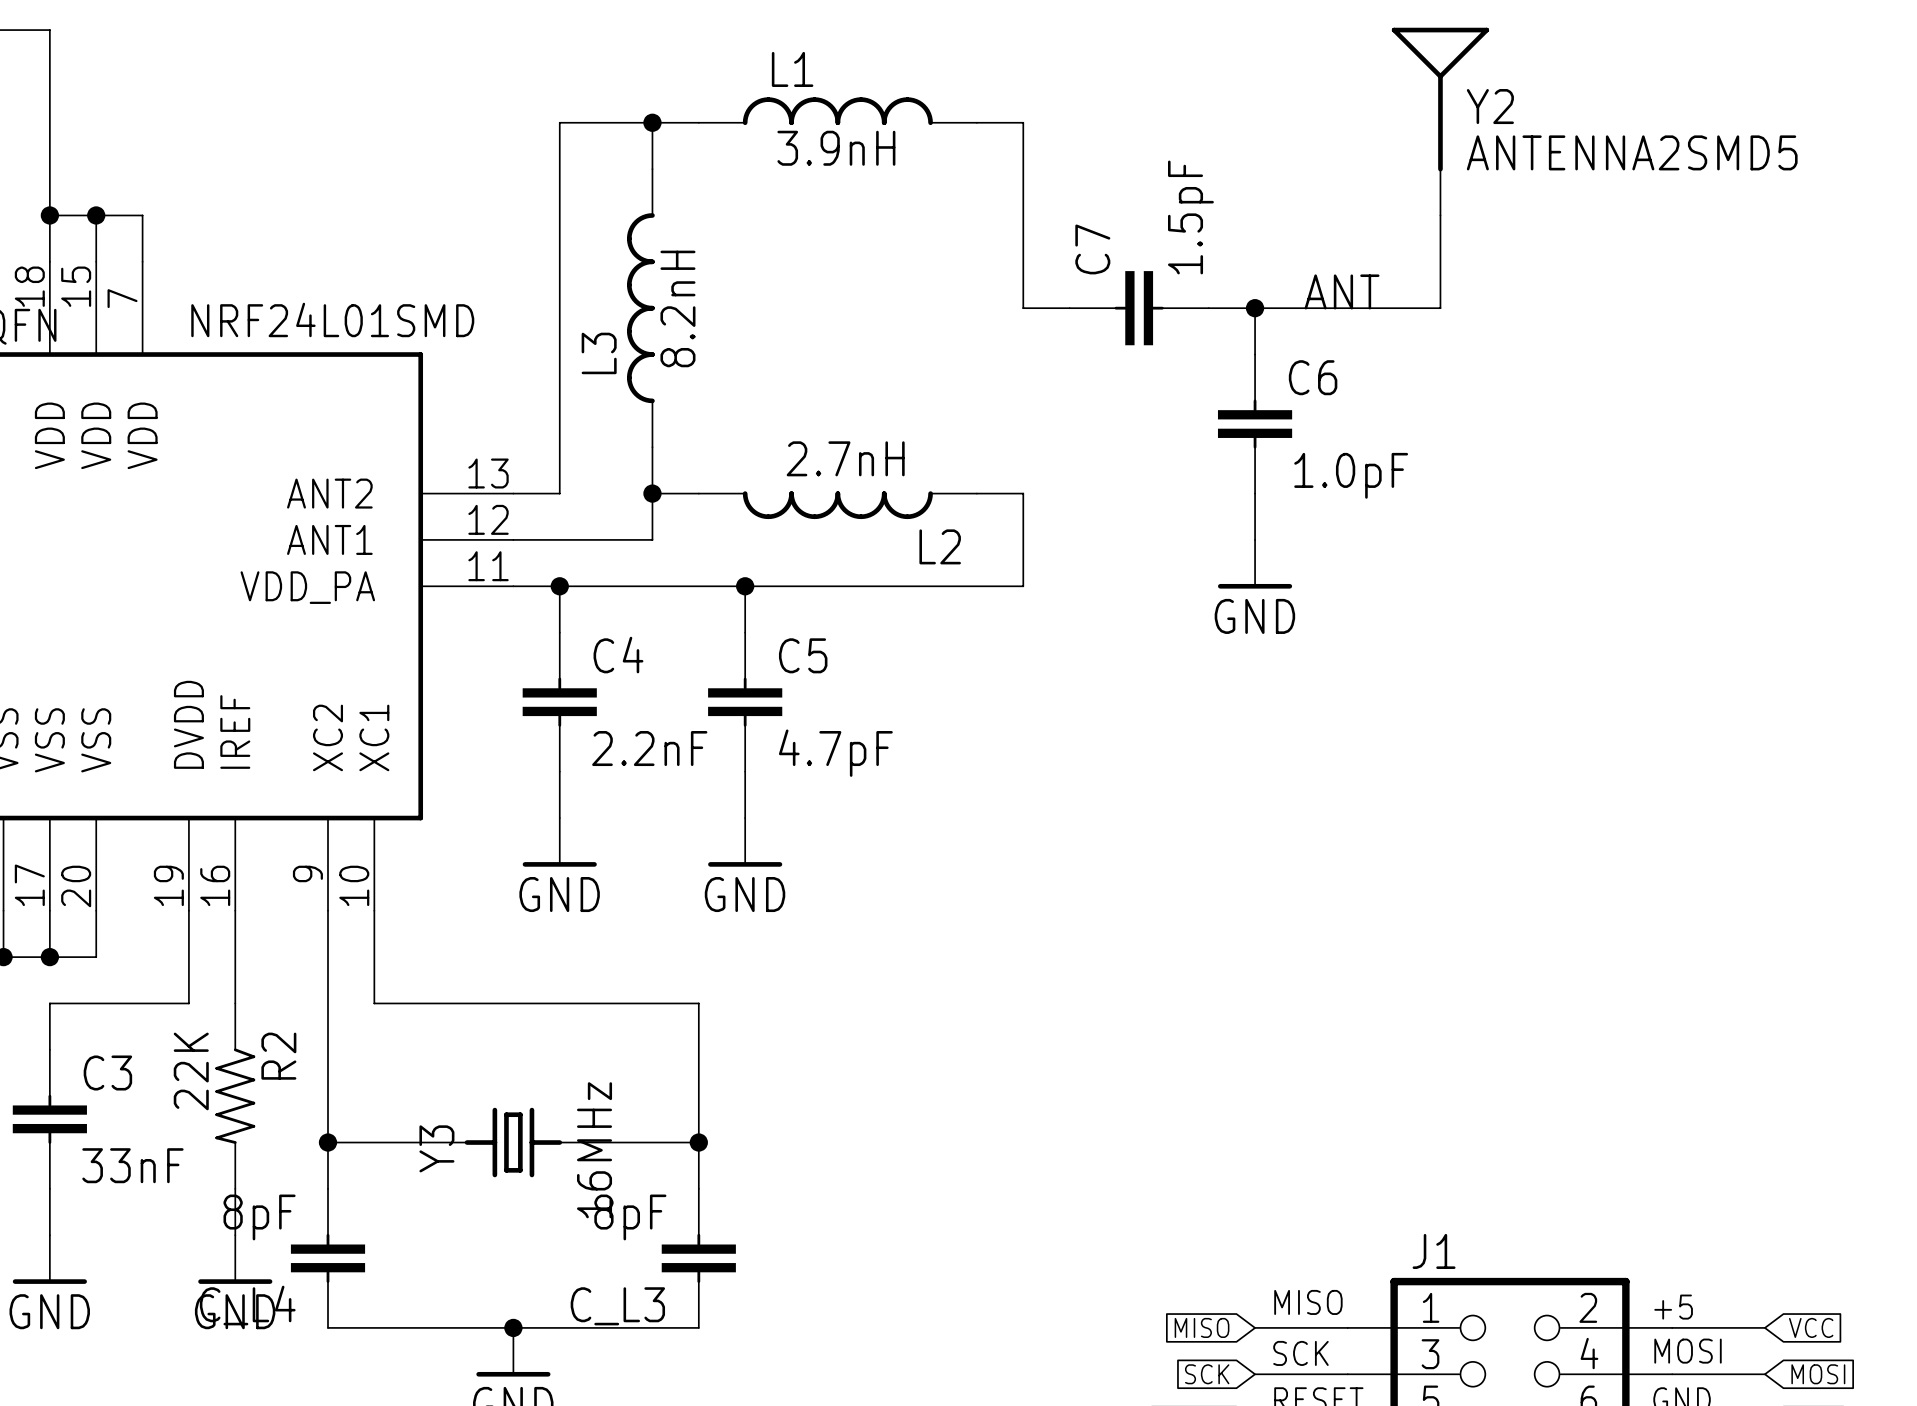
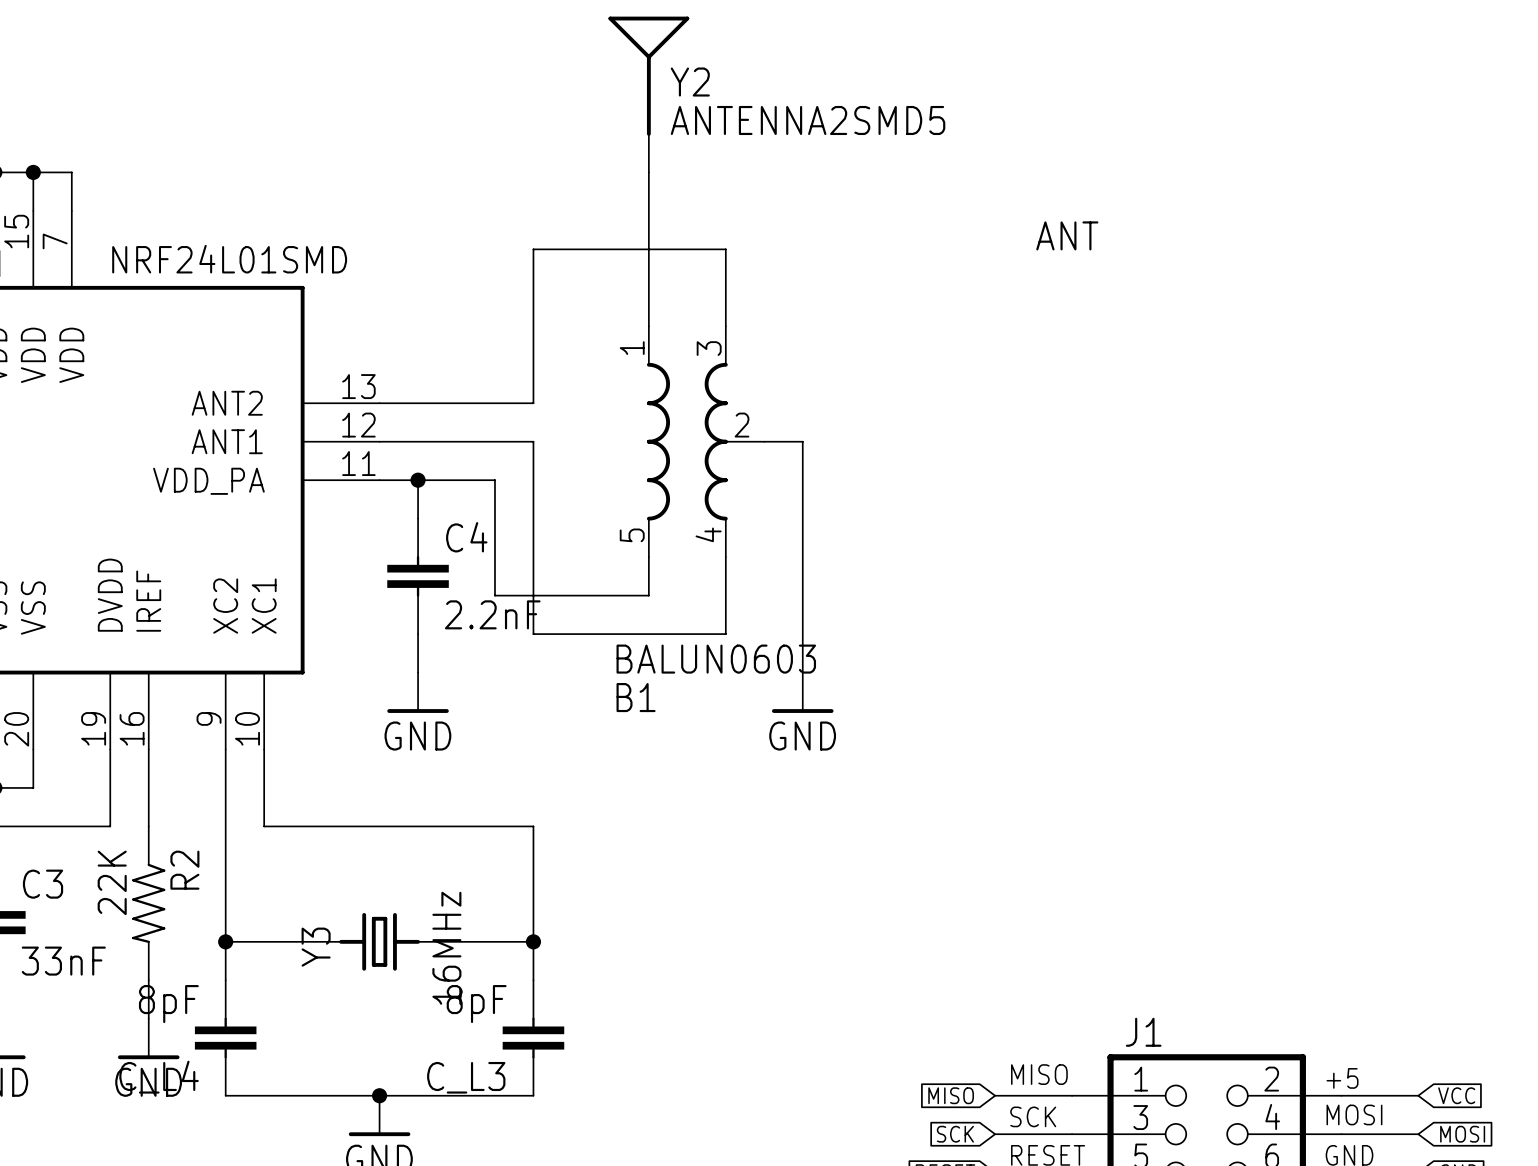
L1: 3.9nH (837, 111) -> none
Y2 position: (1440, 121) -> (648, 94)
wire: (652, 122) (652, 169) -> none
junction: (652, 122) -> none
wire: (698, 122) (559, 122) (559, 493) -> (494, 403) (418, 403)
wire: (976, 122) (1023, 122) (1023, 308) (1069, 308) -> none
wire: none -> (648, 172) (648, 326)
wire: (1440, 215) (1440, 308) (1208, 308) -> none
L3: 8.2nH (640, 308) -> none
C7: 1.5pF (1139, 308) -> none
wire: (1255, 308) (1255, 354) -> none
junction: (1255, 308) -> none
wire: none -> (725, 326) (725, 249) (533, 249) (533, 403)
C6: 1.0pF (1255, 424) -> none
wire: (652, 447) (652, 539) -> (725, 557) (725, 634) (533, 634) (533, 441) (494, 441)
junction: (652, 493) -> none
wire: (976, 493) (1023, 493) (1023, 539) -> (764, 441) (802, 441)
wire: (1255, 493) (1255, 539) -> none
L2: 2.7nH (837, 505) -> none
B1: none -> BALUN0603 (705, 441)
power symbol: GND (1255, 564) -> none
wire: (652, 586) (1023, 586) -> (494, 480) (494, 595) (648, 595) (648, 557)
wire: (745, 586) (745, 632) -> none
junction: (745, 586) -> none
wire: none -> (802, 480) (802, 672)
C5: 4.7pF (745, 702) -> none
wire: (745, 771) (745, 818) -> none
power symbol: GND (745, 842) -> none
power symbol: none -> GND (802, 692)

